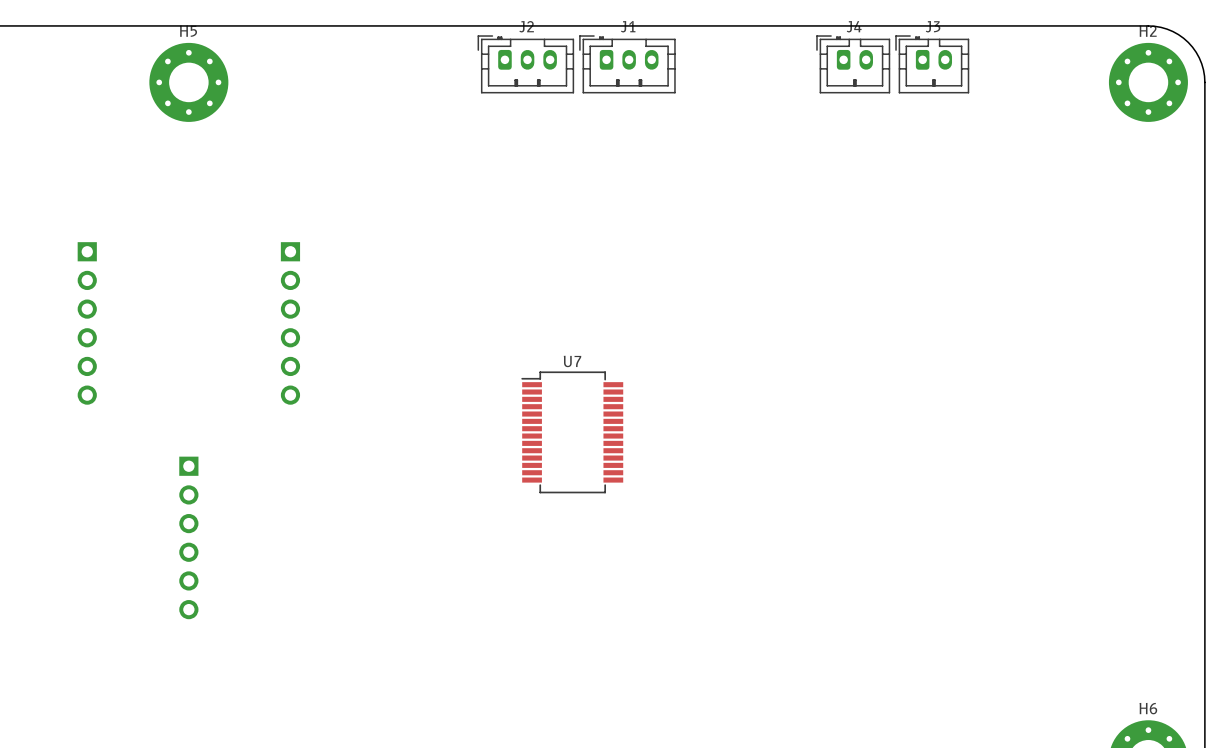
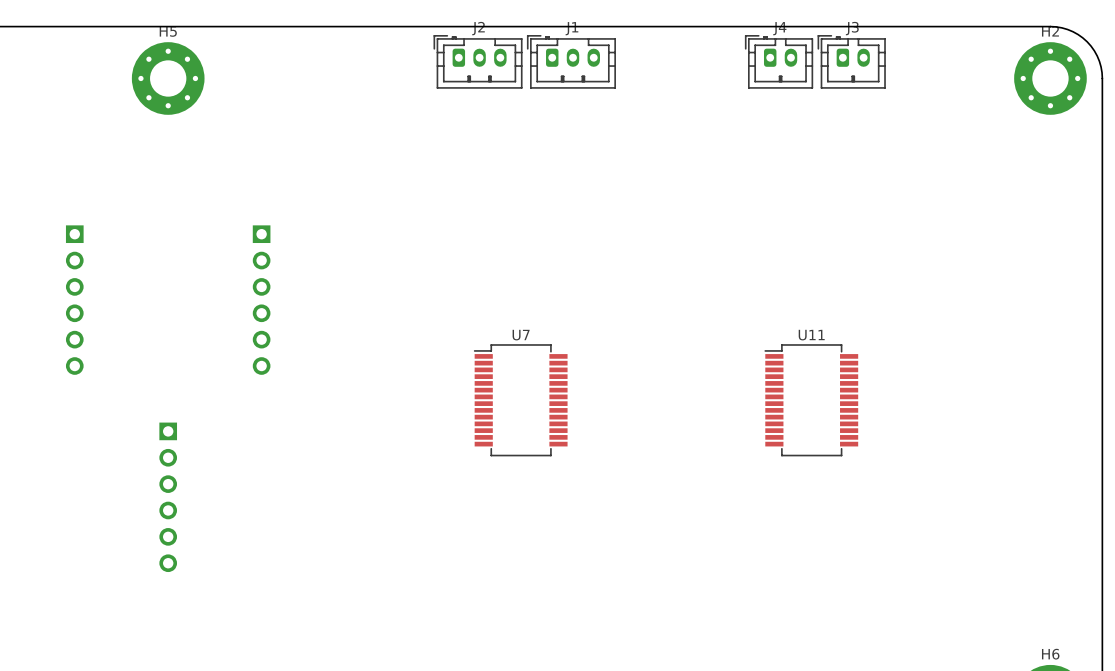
U11: none -> (811, 400)

